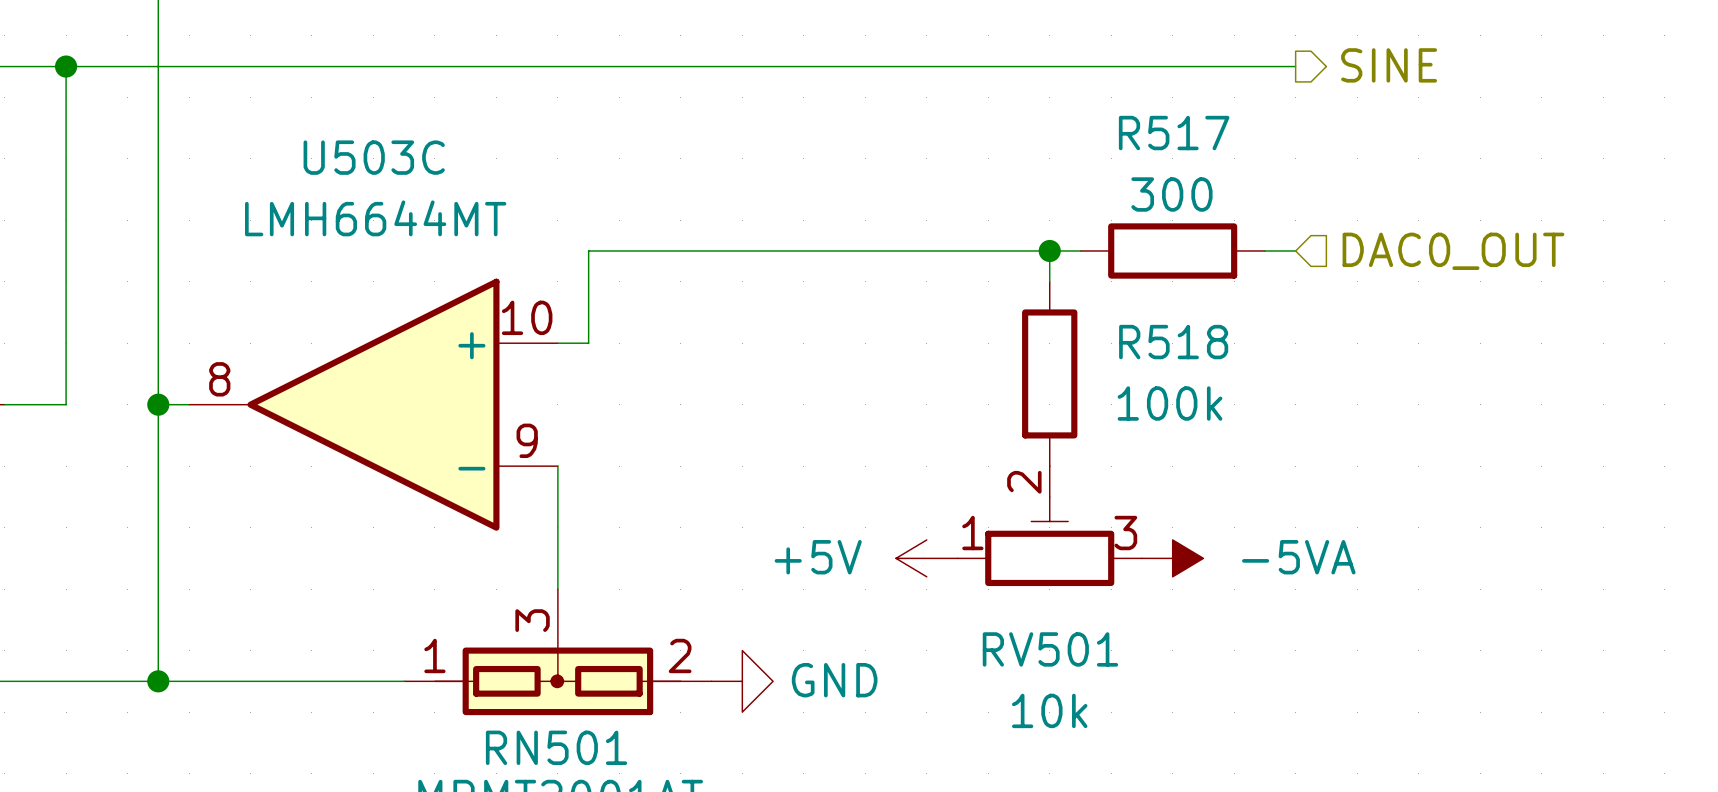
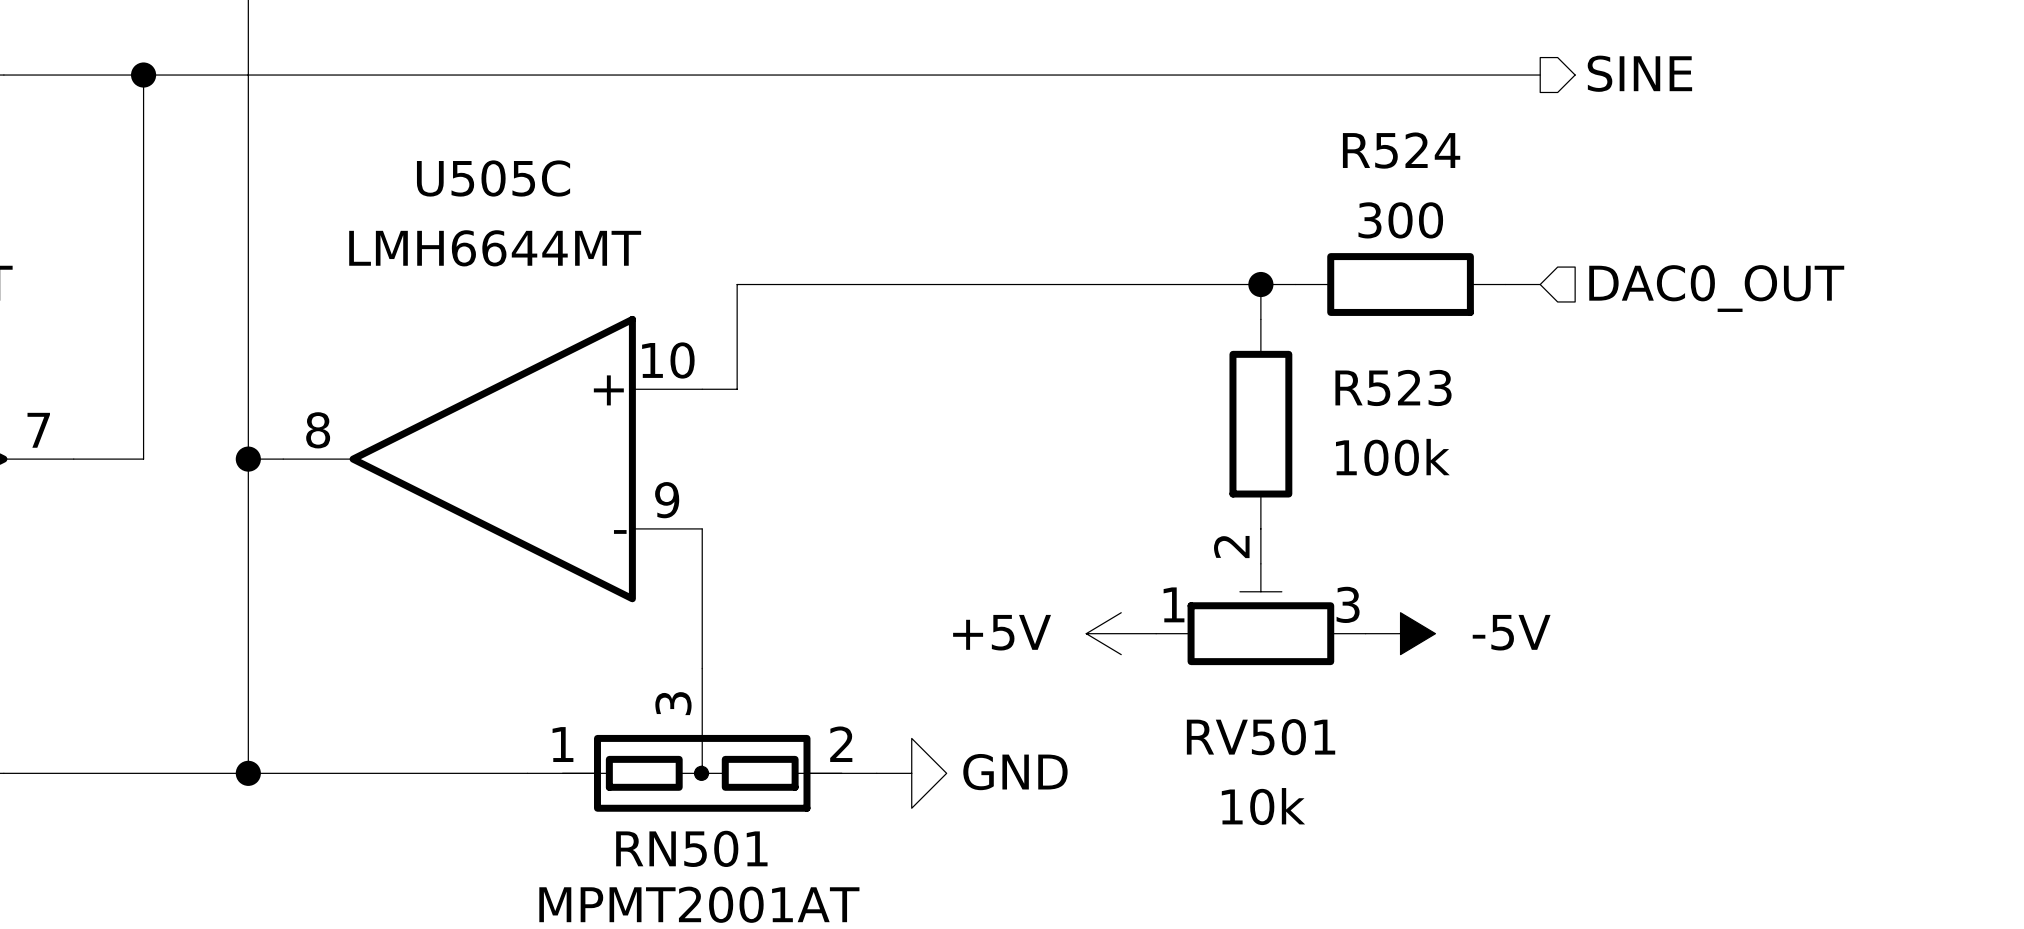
R517 name: R517 (1174, 133) -> R524 (1401, 150)
U503C name: U503C (374, 157) -> U505C (493, 178)
R518 name: R518 (1173, 342) -> R523 (1393, 387)
power symbol: -5VA (1172, 558) -> -5V (1400, 633)

